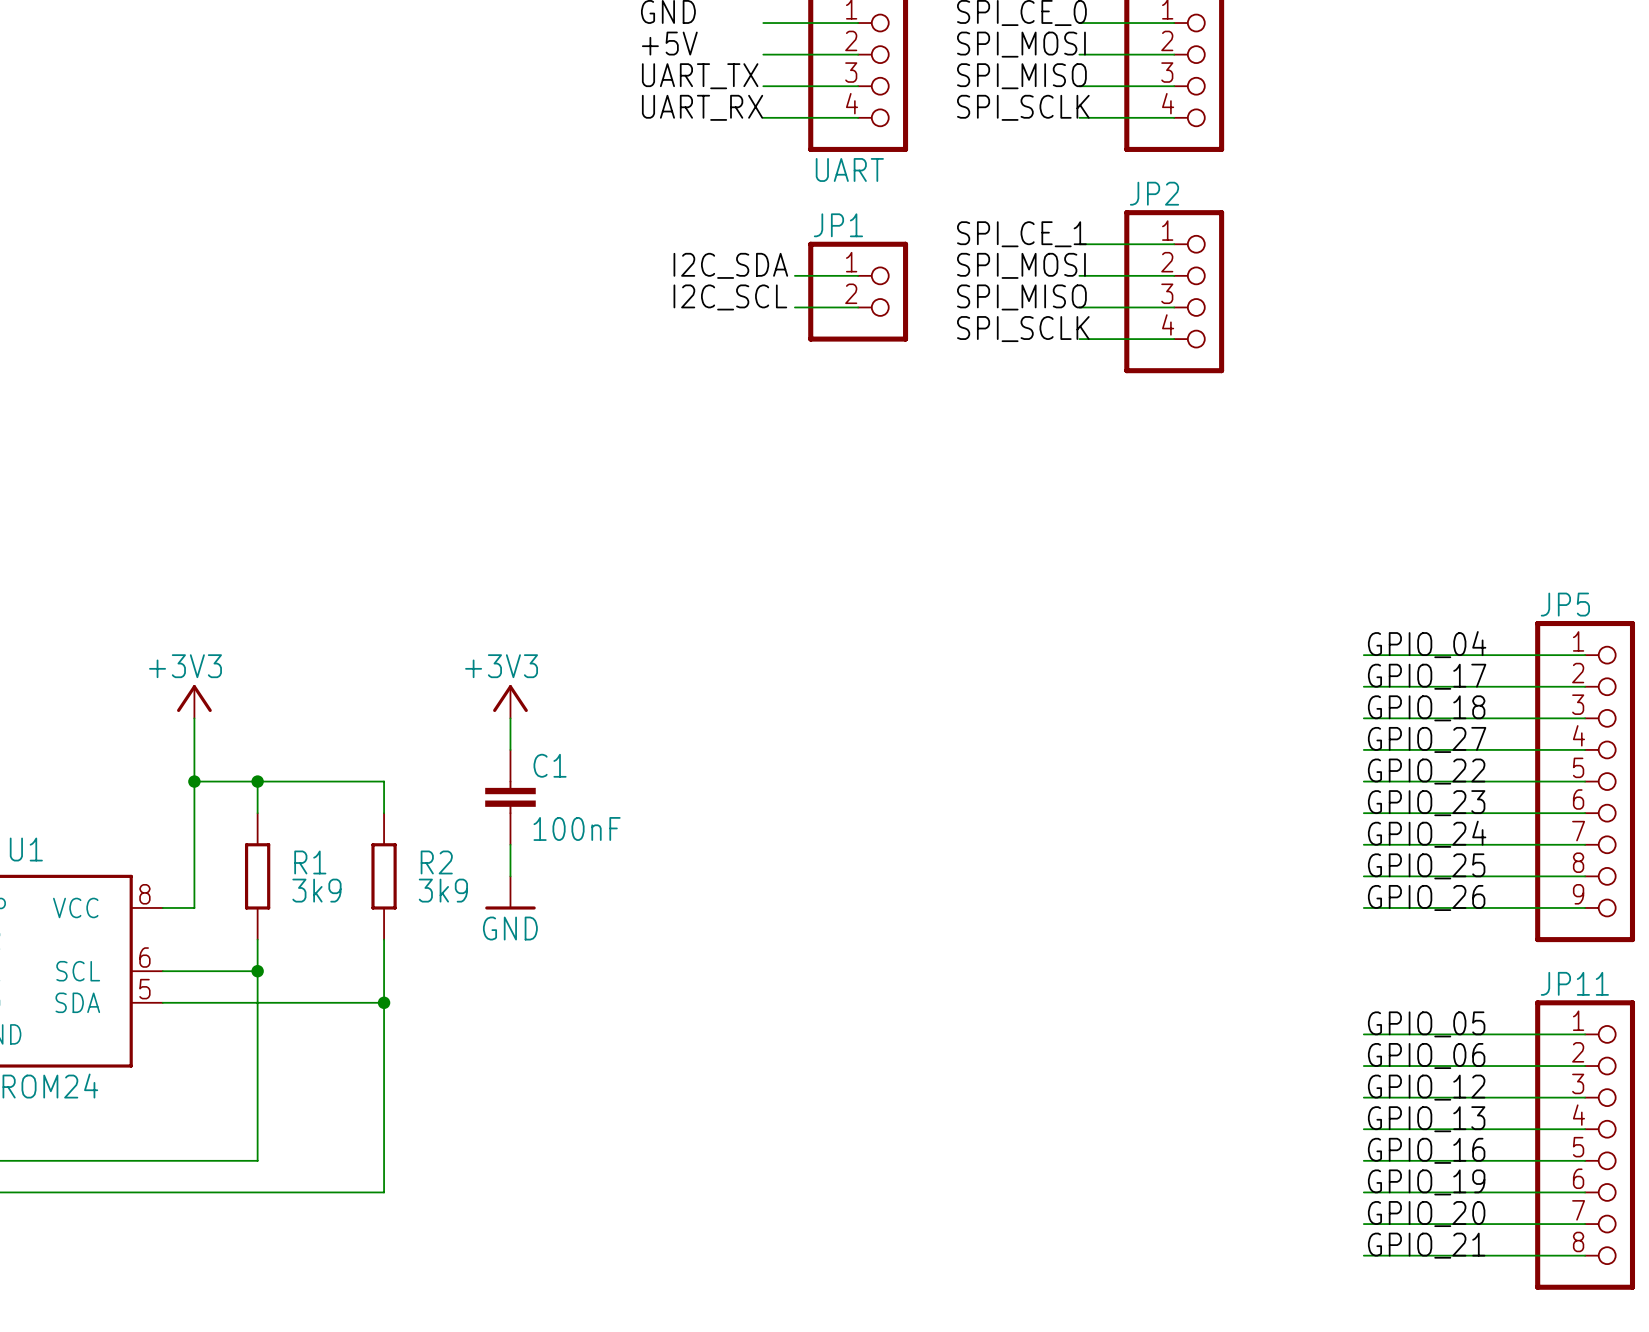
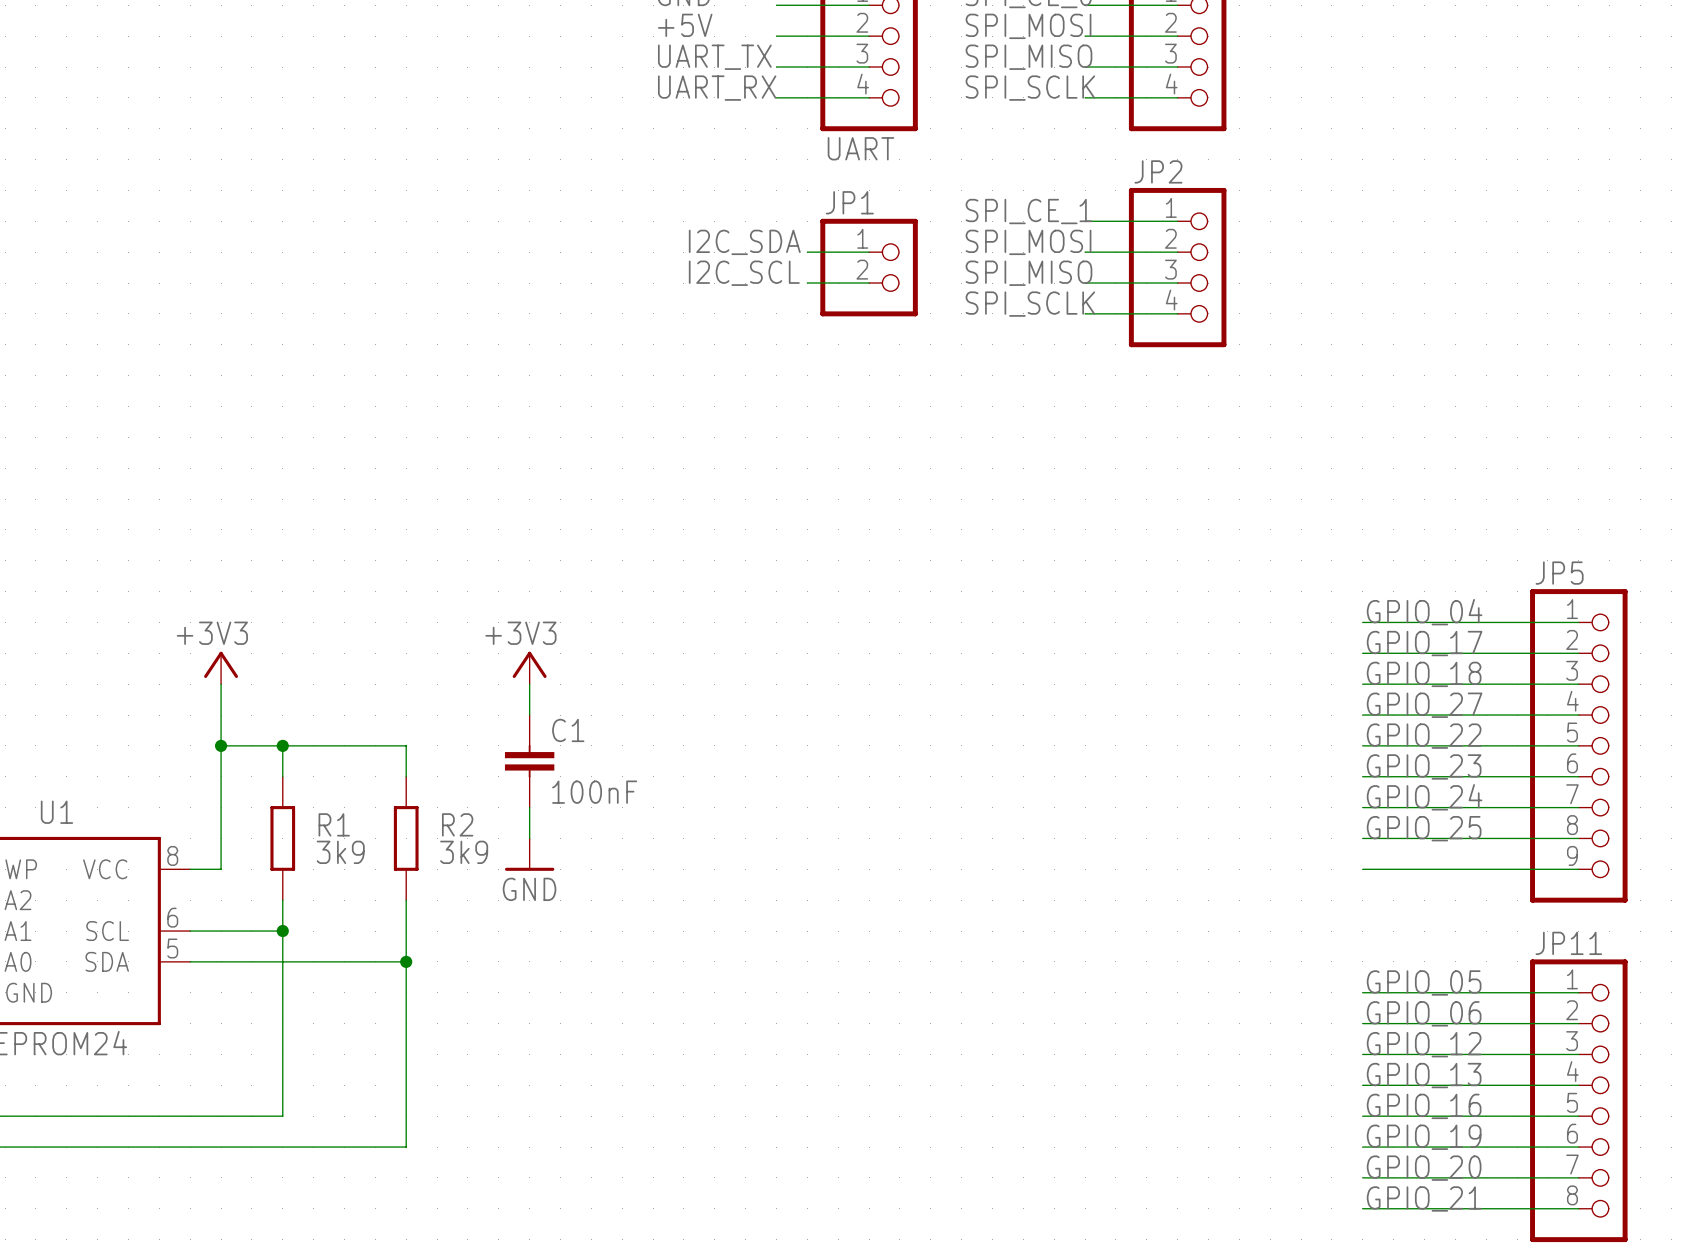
label: GPIO_26 (1426, 897) -> none

